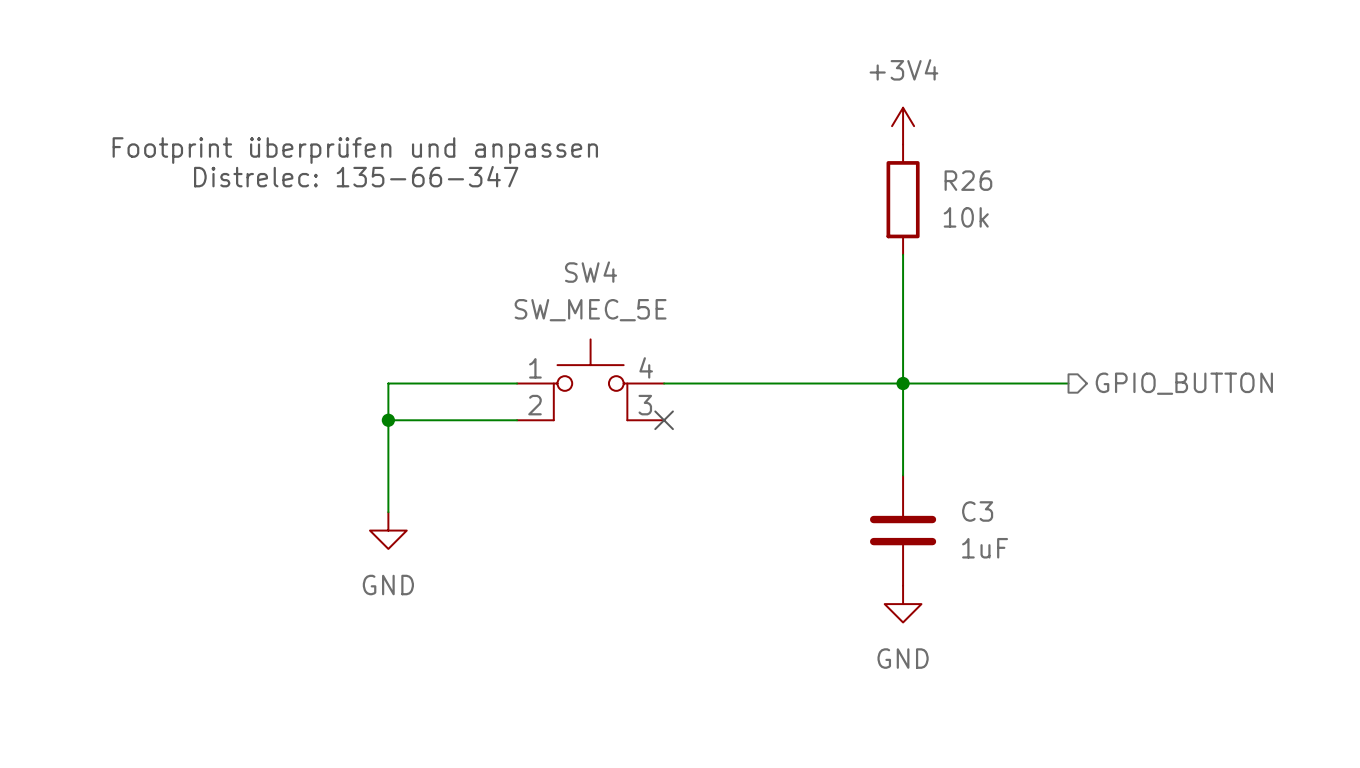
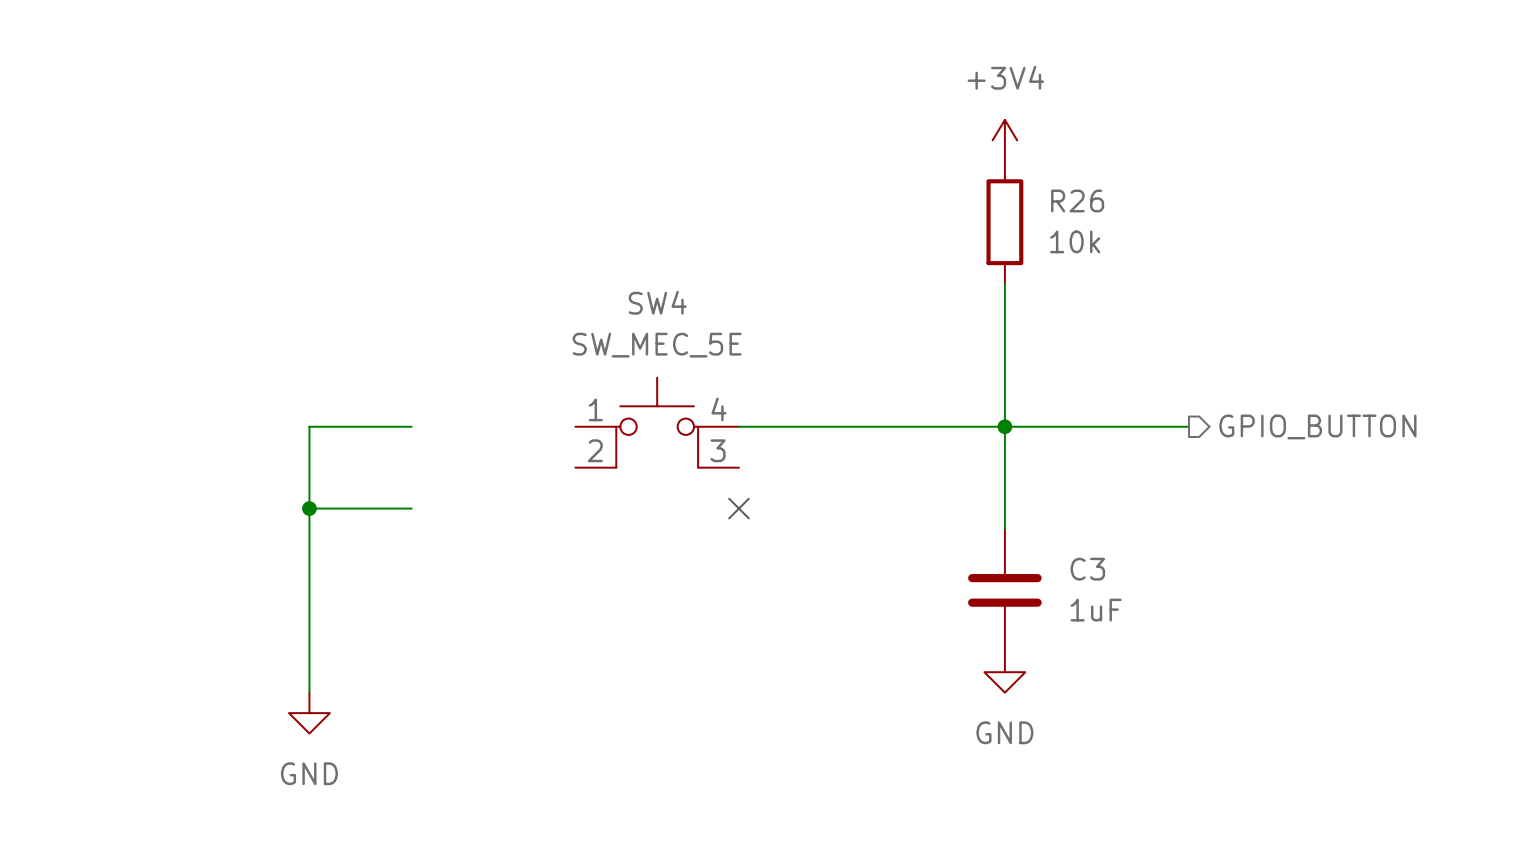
text: Footprint überprüfen und anpassen (355, 150) -> none
text: Distrelec: 135-66-347 (356, 176) -> none
wire: none -> (411, 426) (309, 426) (309, 692)
wire: (517, 383) (388, 383) (388, 512) -> none
wire: (388, 420) (517, 420) -> none
junction: (388, 420) -> none
no-connect mark position: (664, 420) -> (738, 508)
wire: none -> (309, 508) (411, 508)
junction: none -> (309, 508)
power symbol position: GND (388, 530) -> GND (309, 713)

